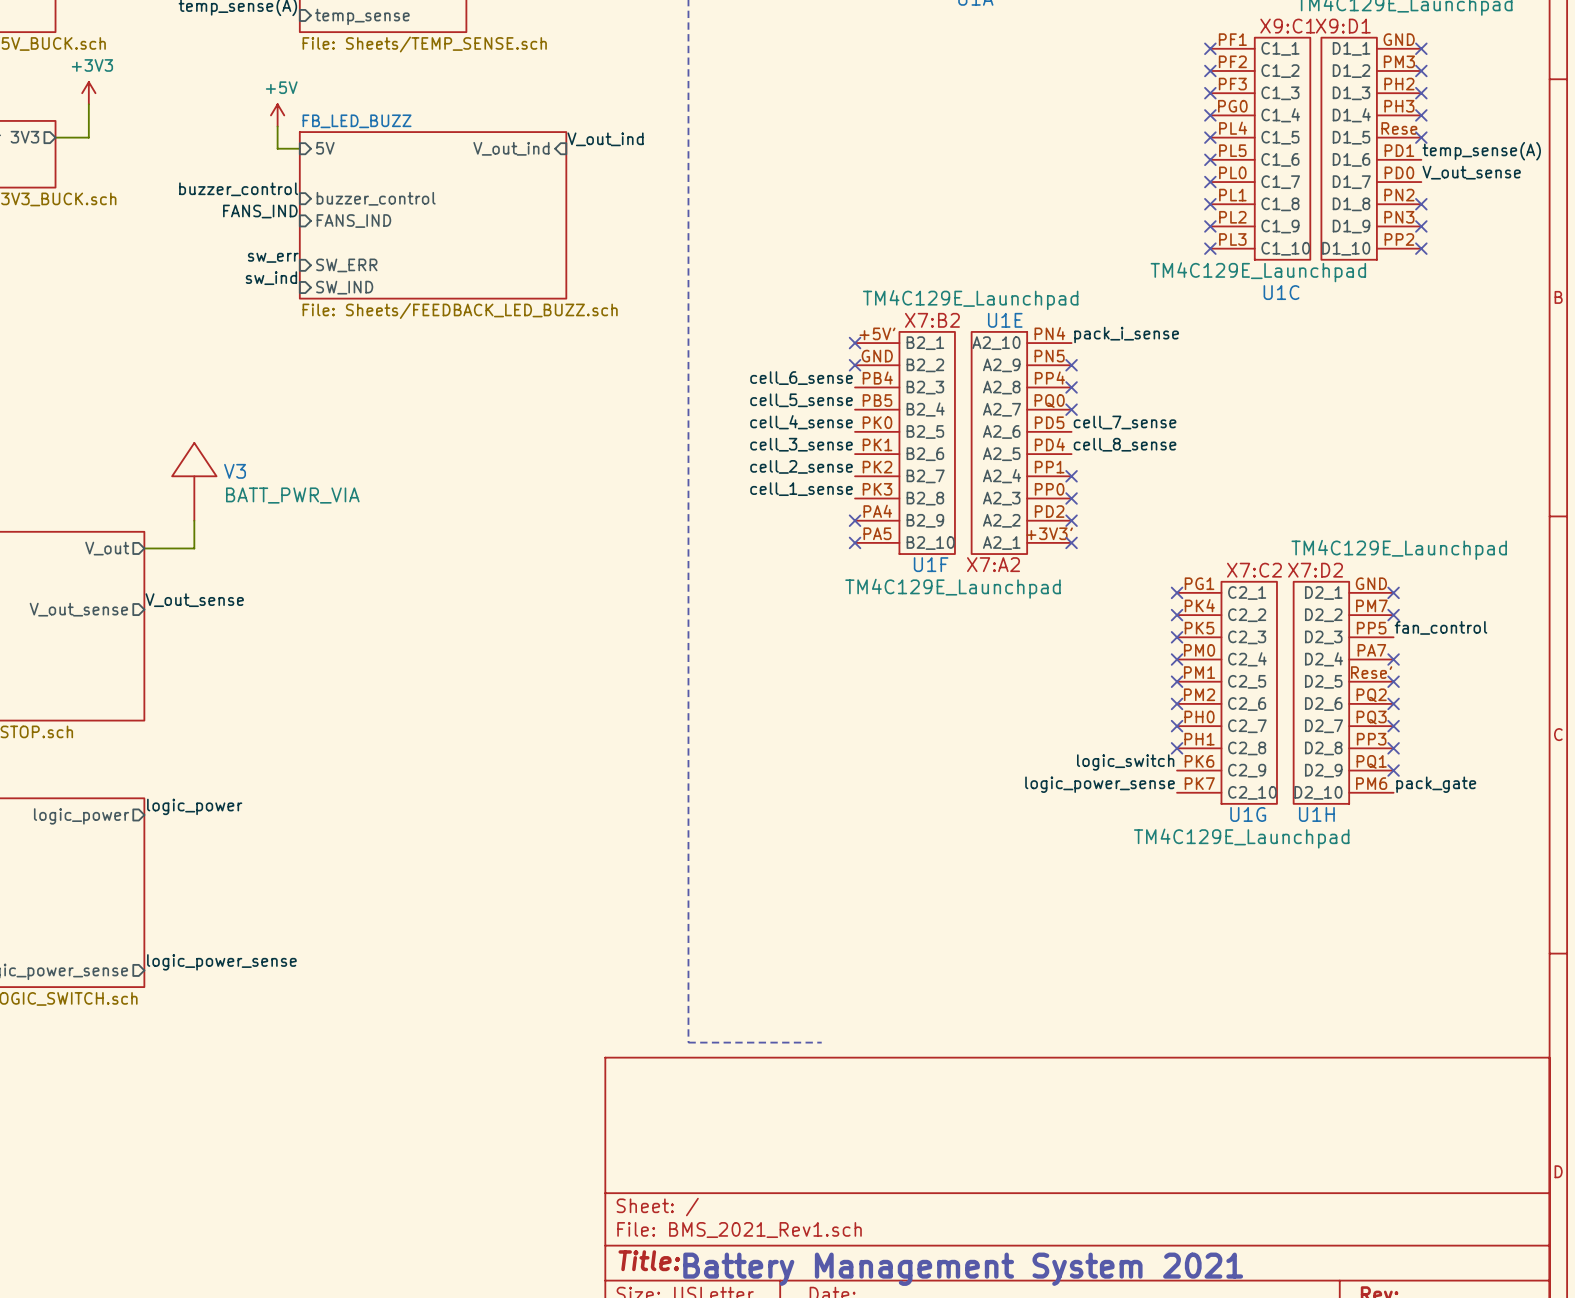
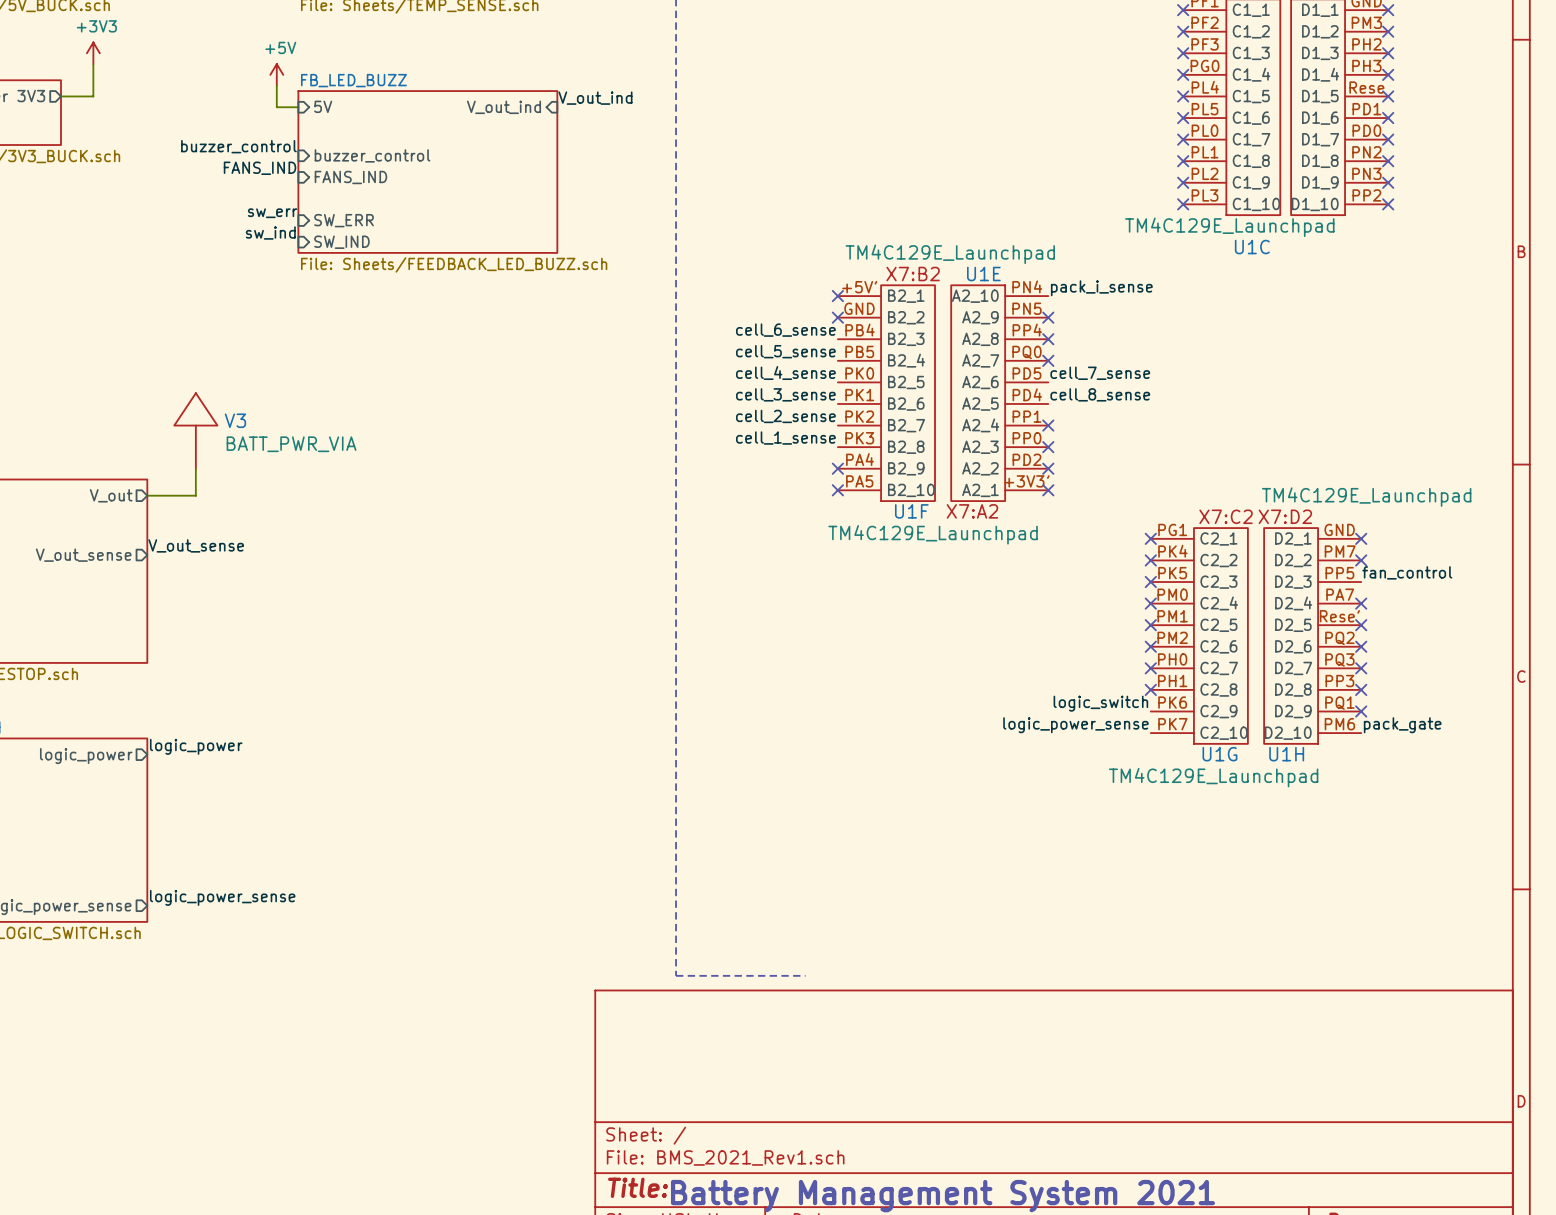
label: temp_sense(A) (1481, 151) -> none
no-connect mark: none -> (1388, 118)
label: V_out_sense (1471, 172) -> none
no-connect mark: none -> (1388, 139)

